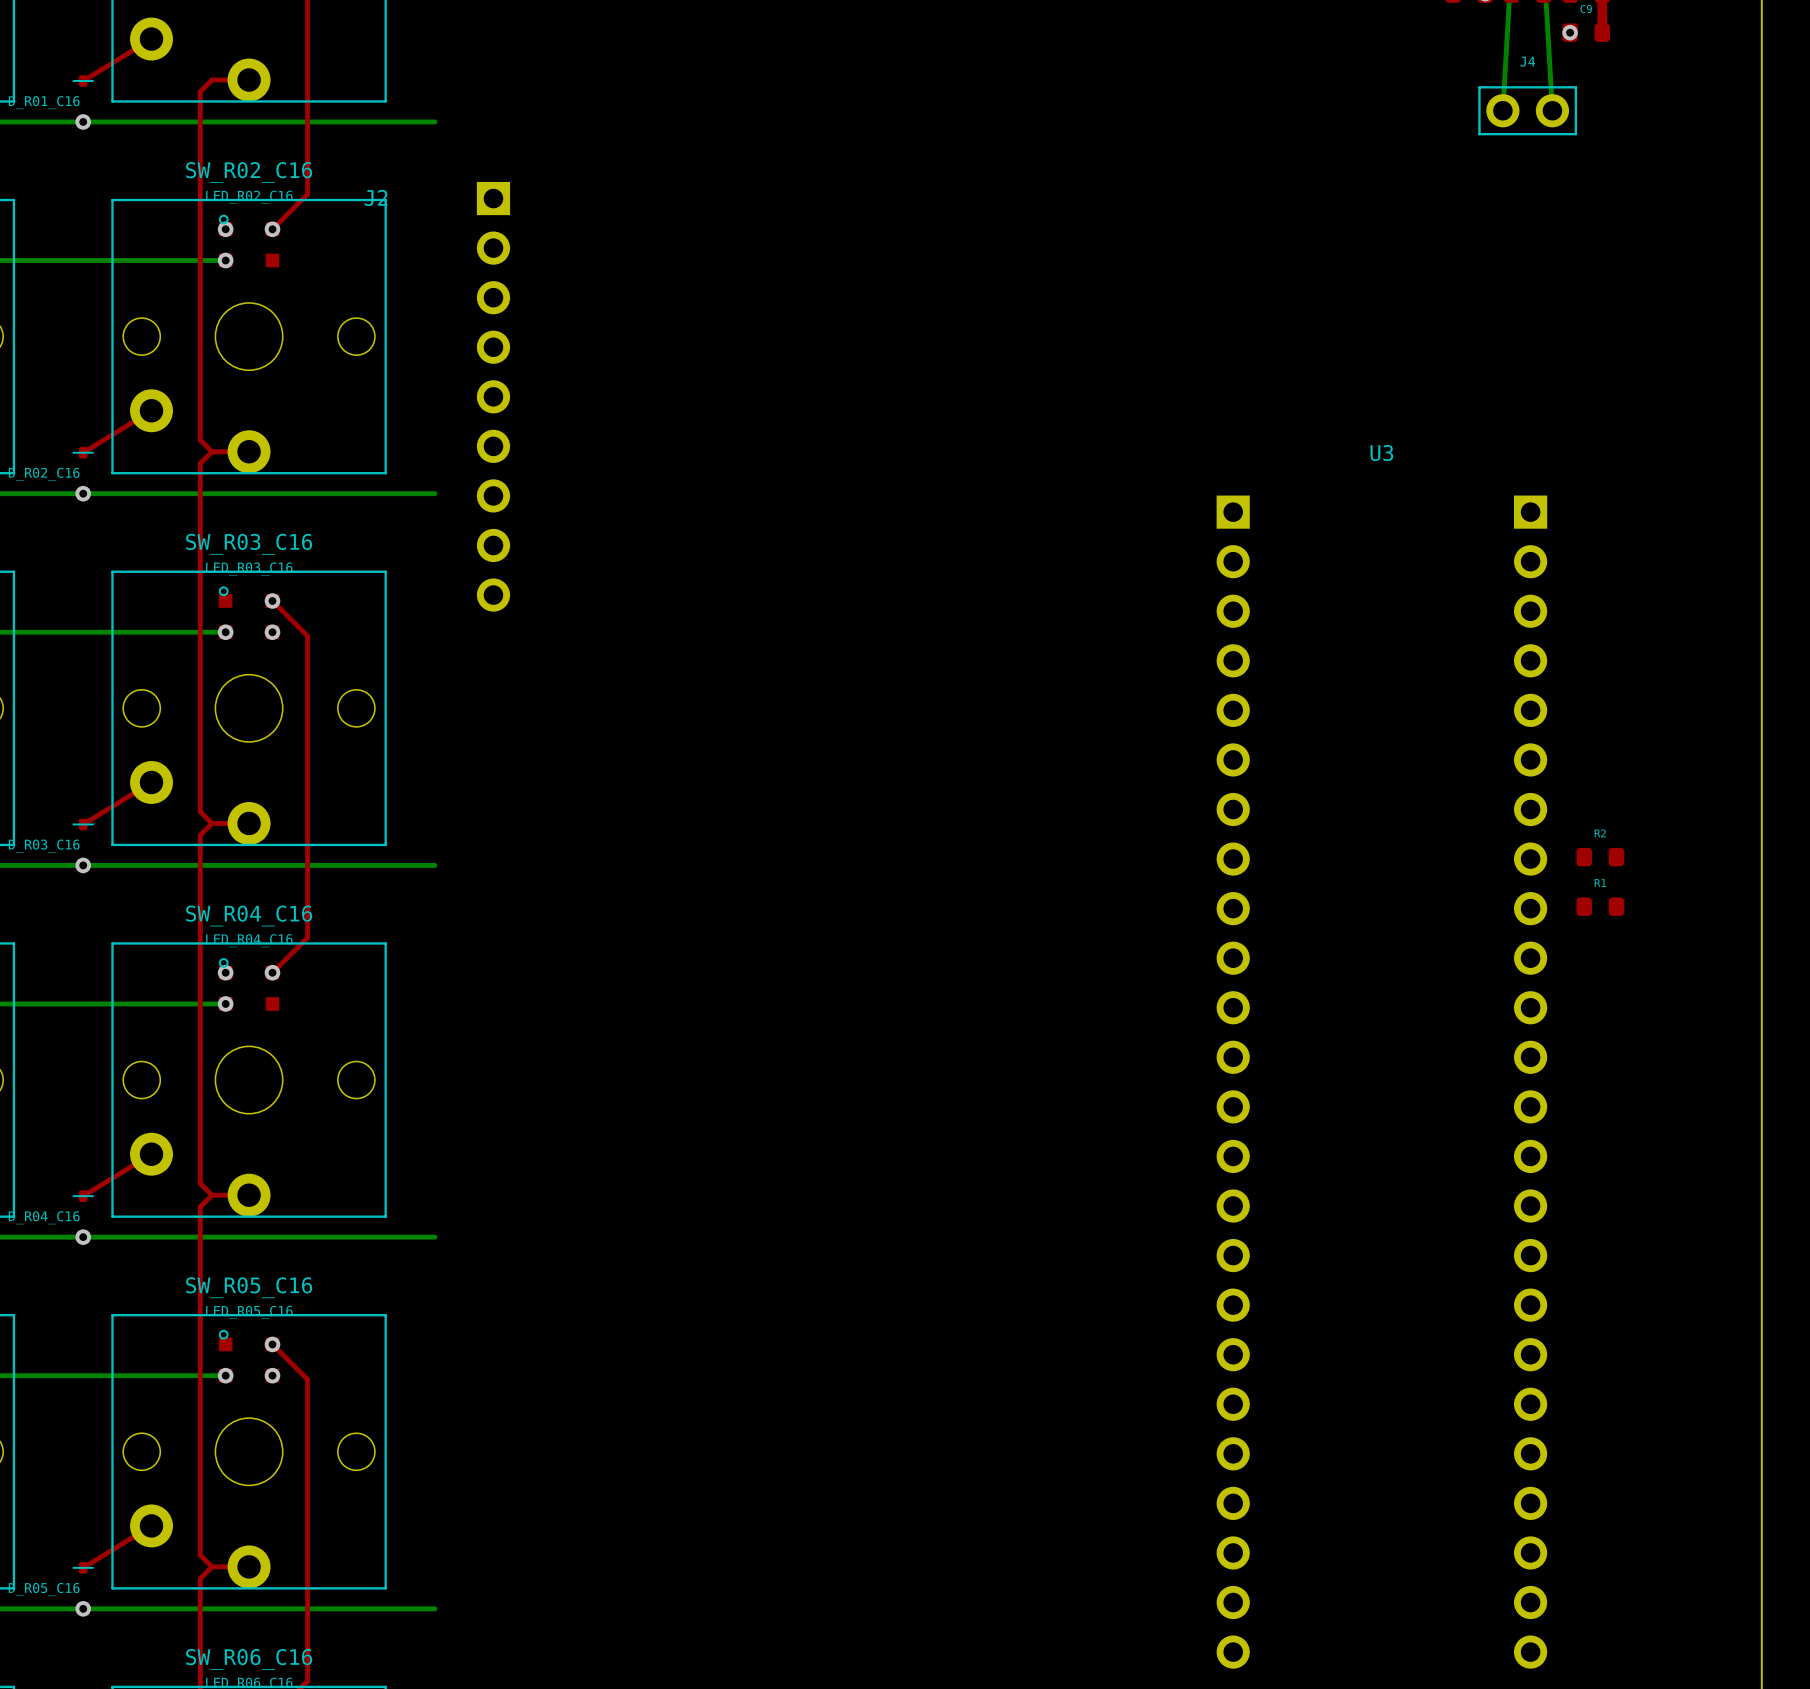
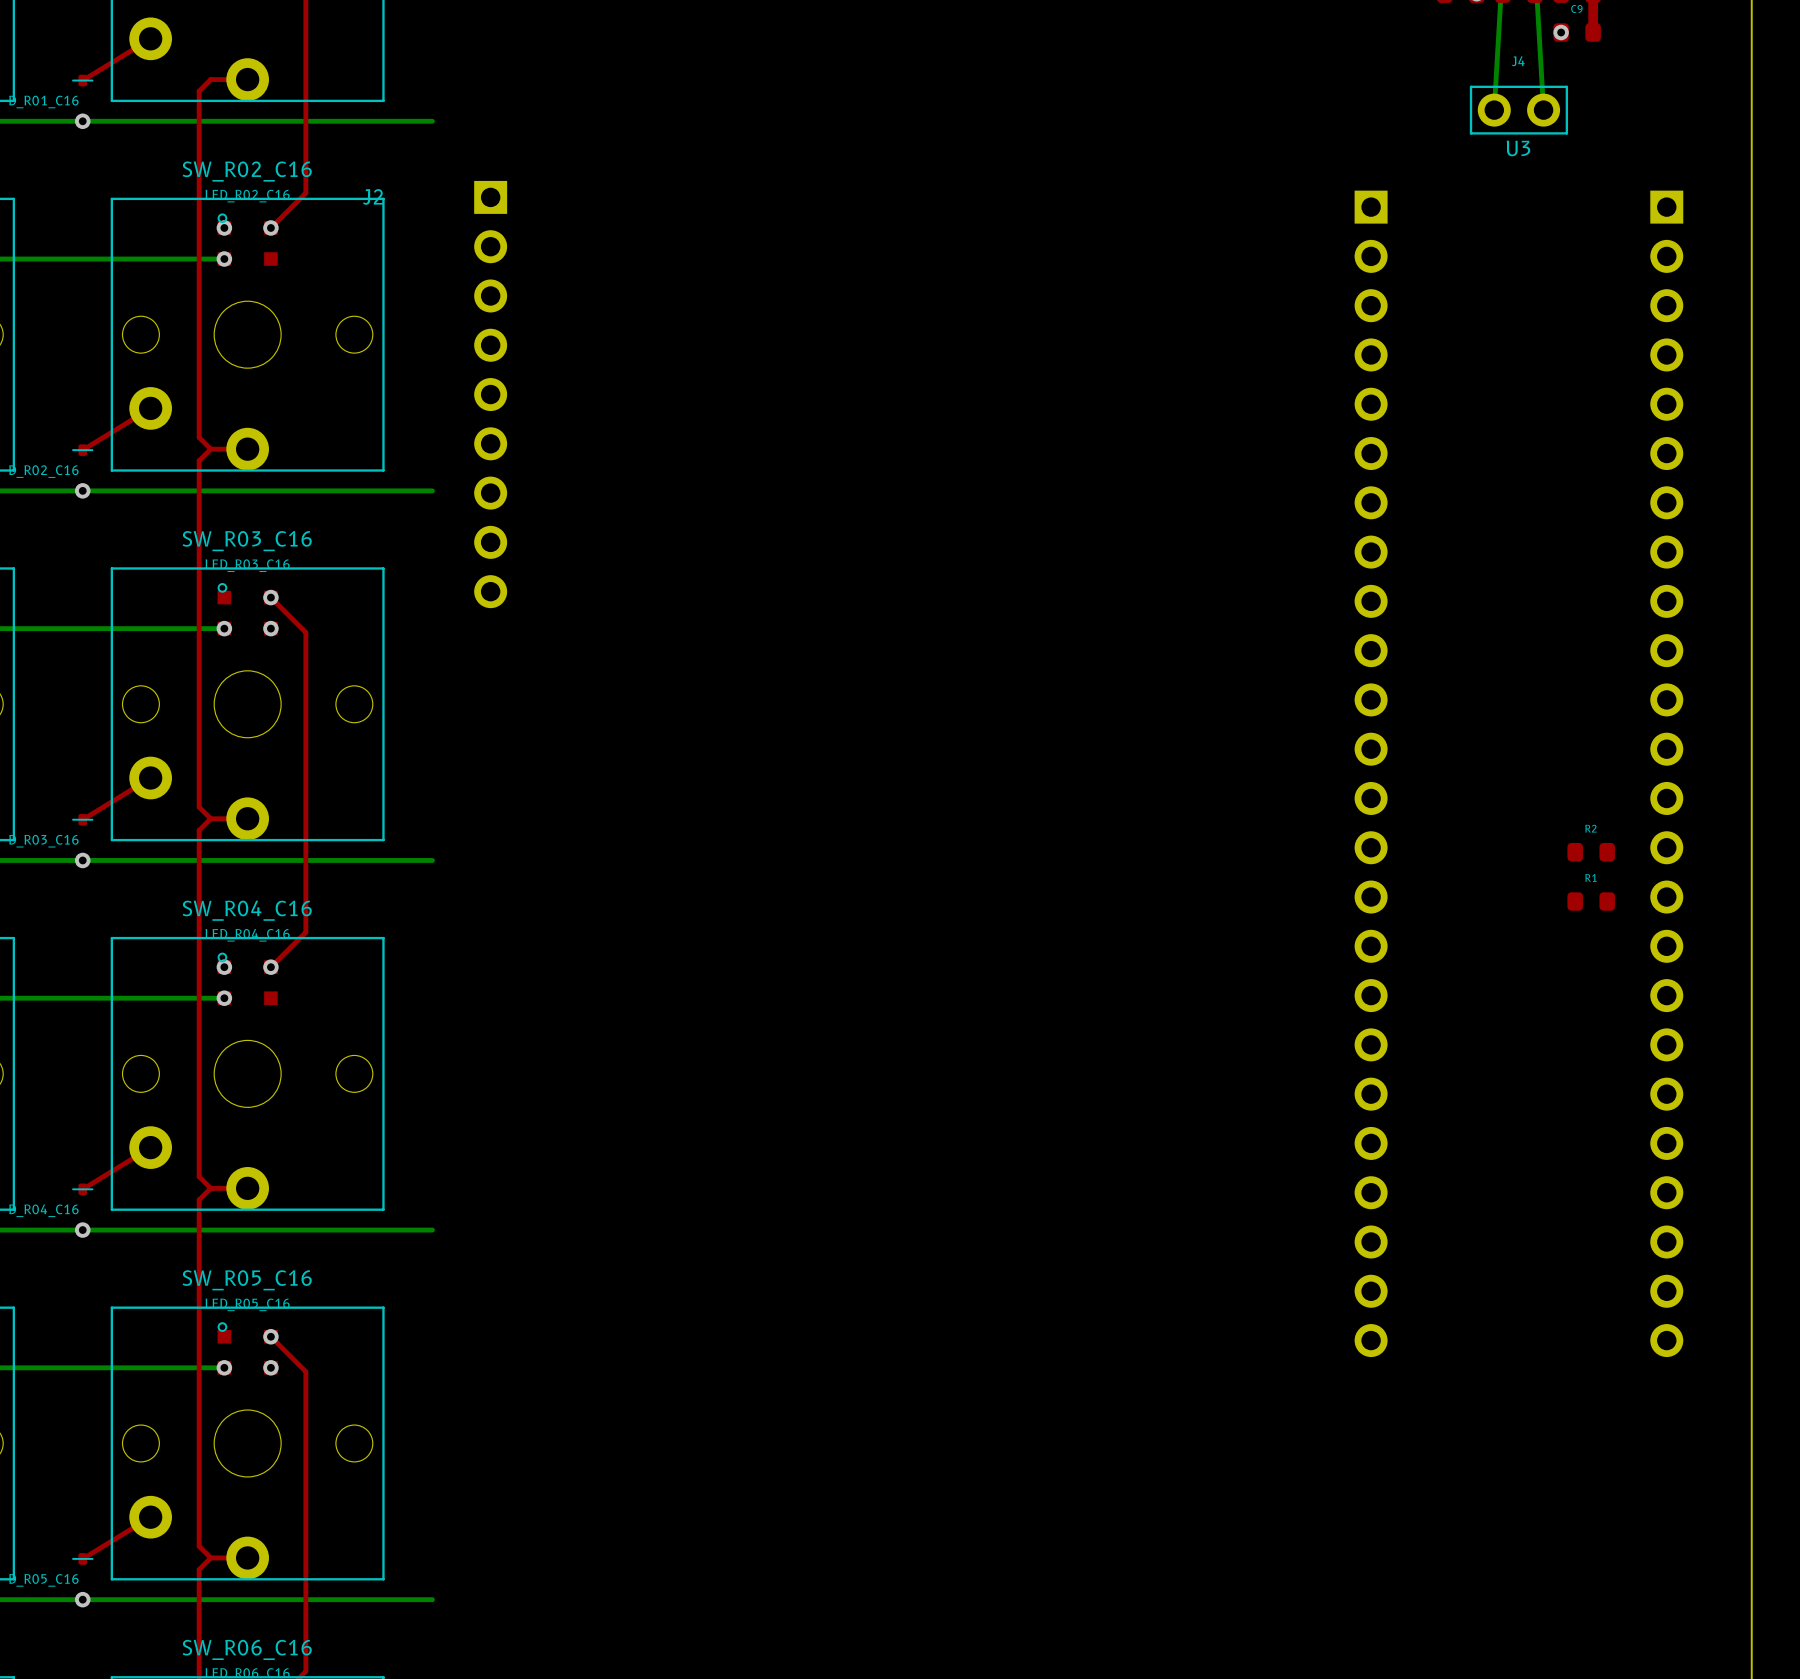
U3 position: (1381, 1082) -> (1518, 773)

